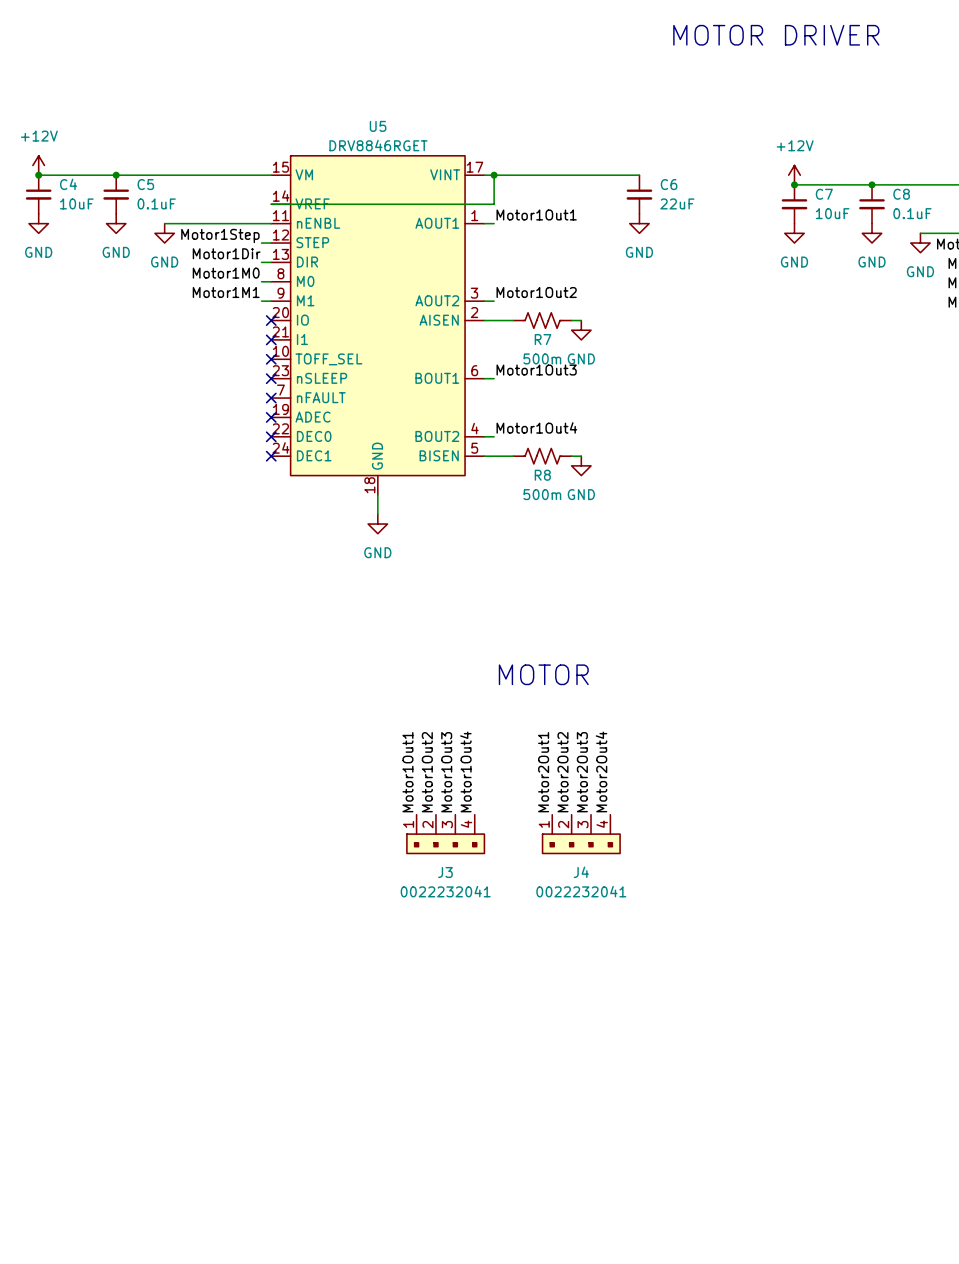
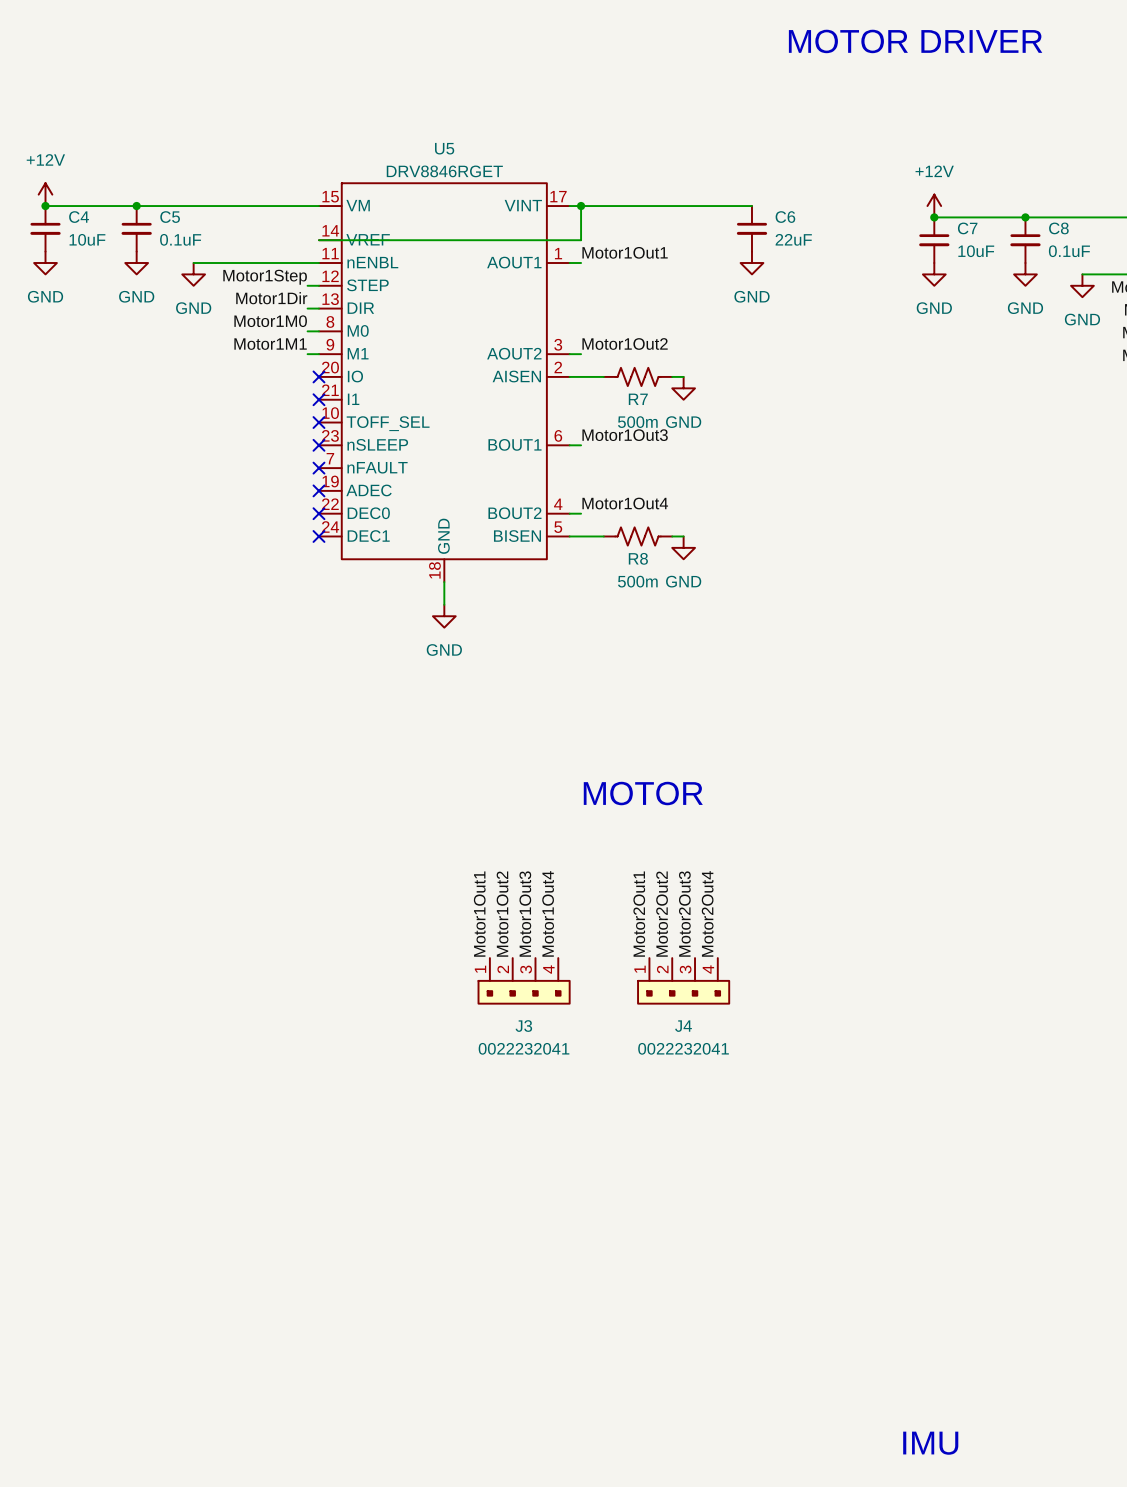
U5 symbol: [271, 155, 485, 495] -> [318, 183, 570, 583]
text: none -> IMU (930, 1443)

